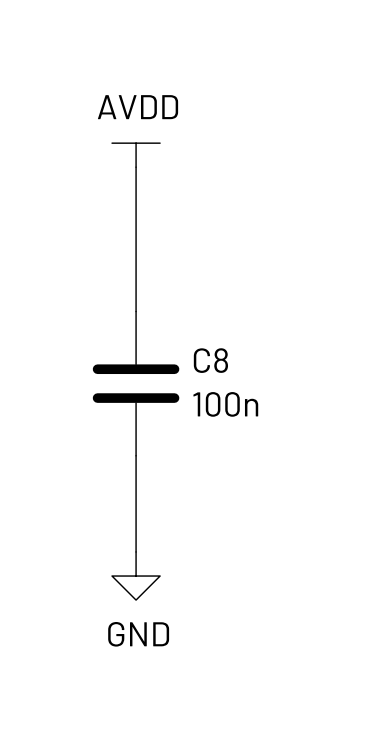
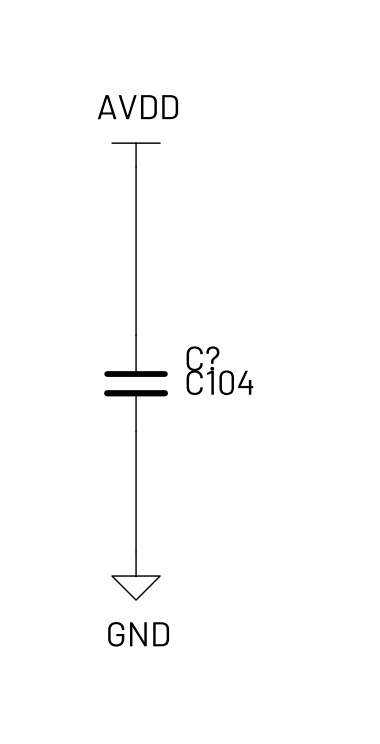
C8: 100n (136, 383) -> none
C?: none -> C104 (136, 383)

